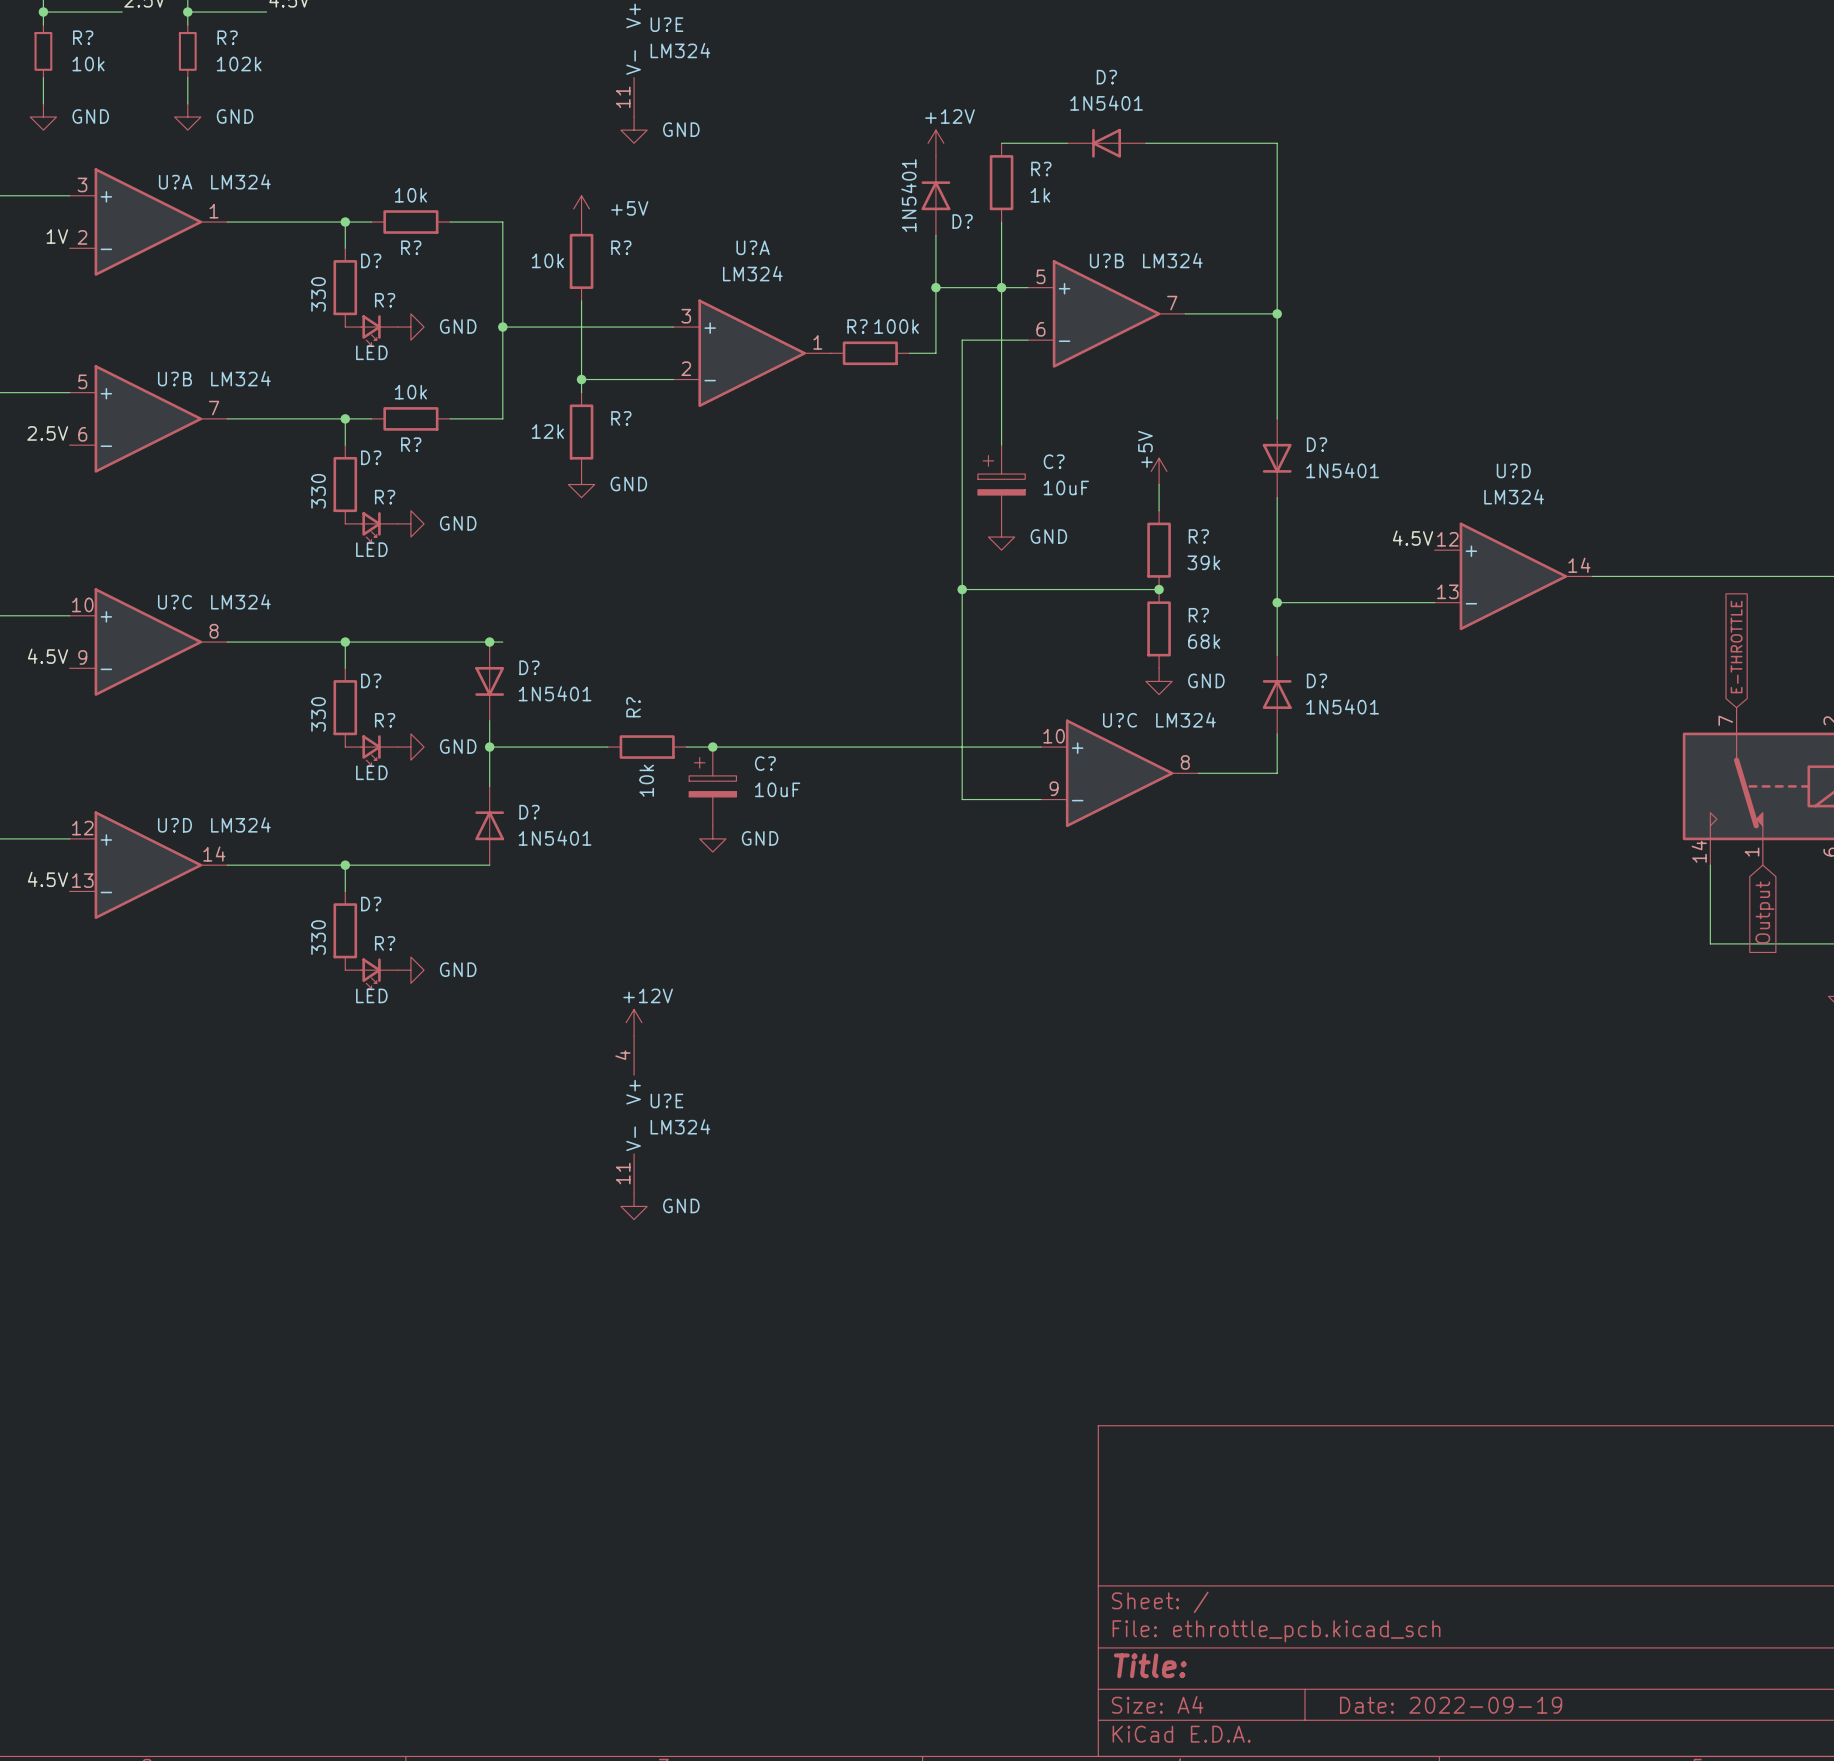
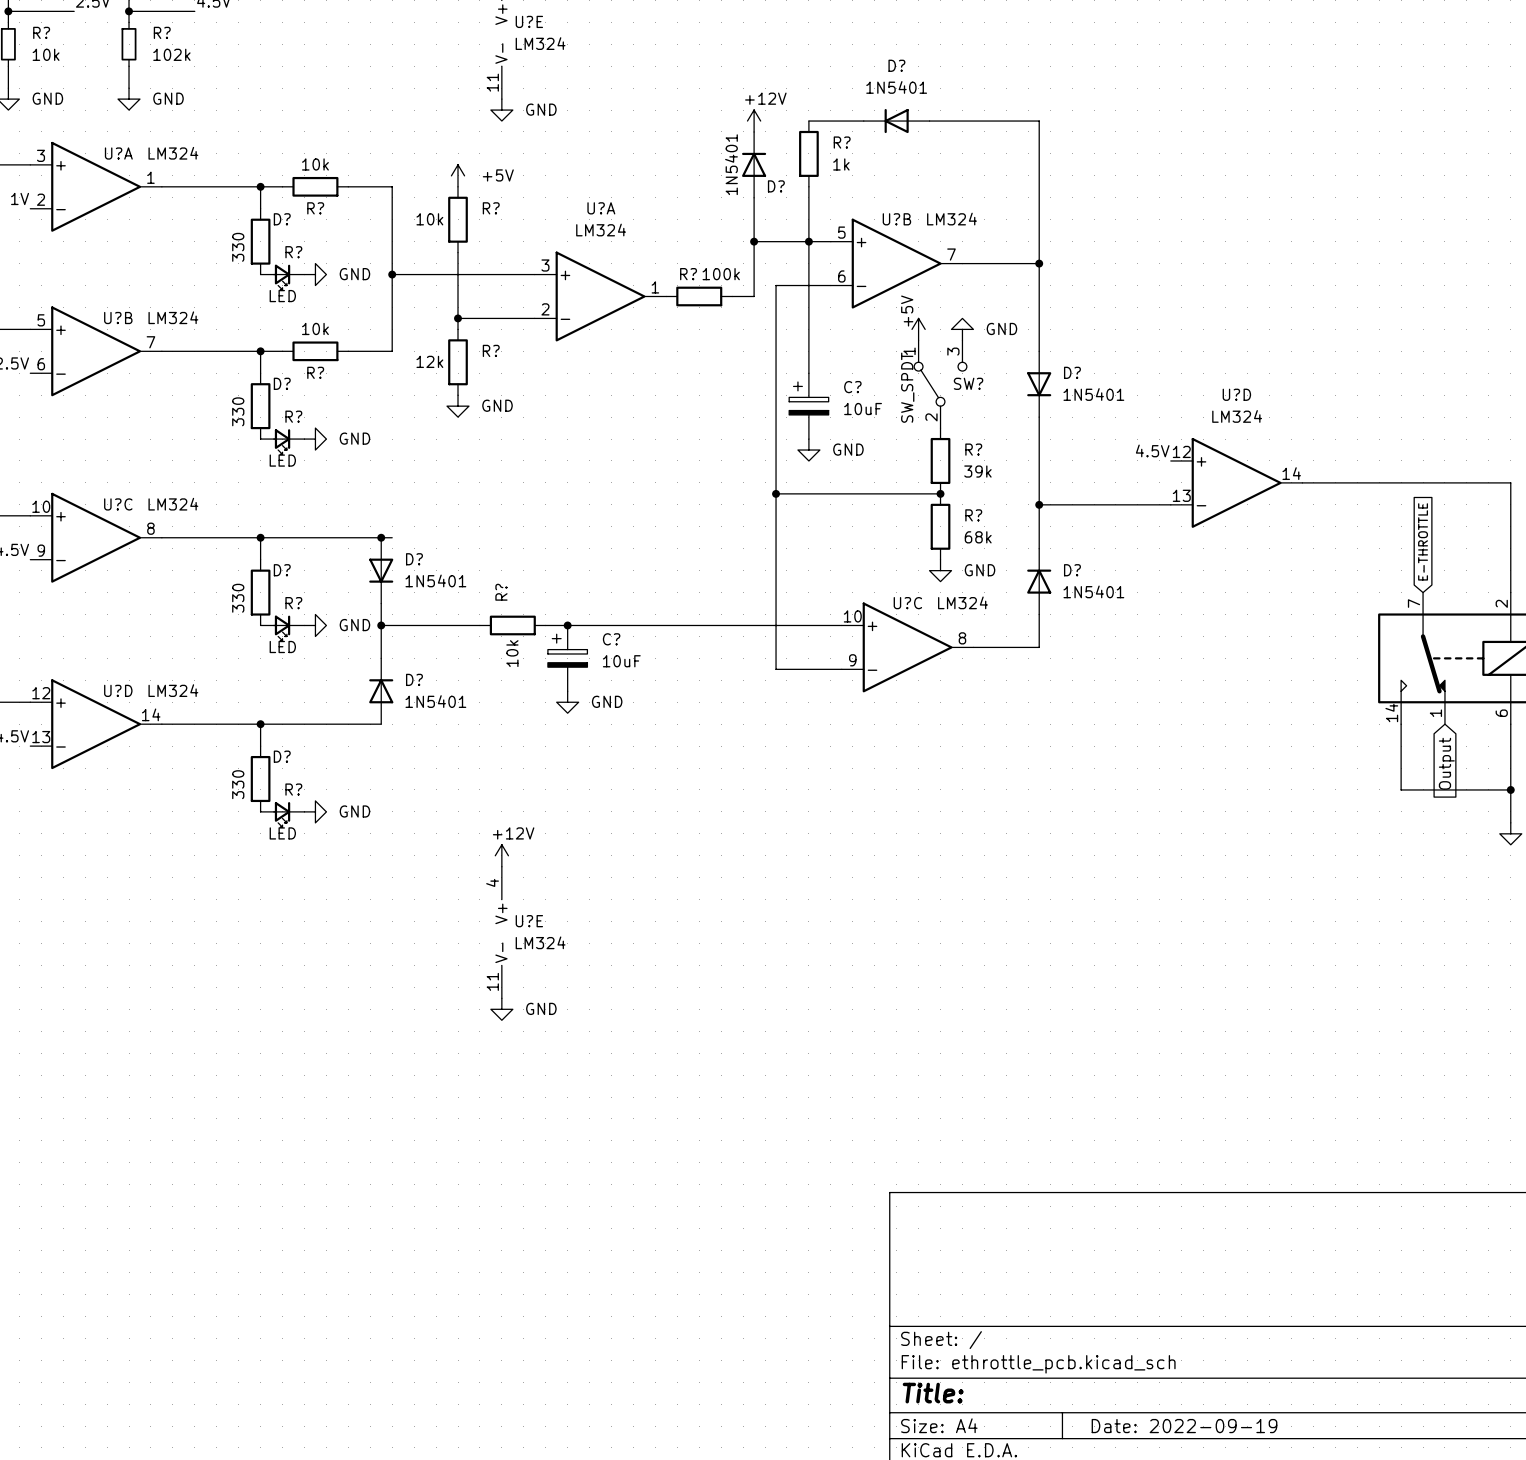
power symbol: none -> GND (962, 329)
SW?: none -> SW_SPDT (940, 384)
power symbol position: +5V (1159, 471) -> +5V (918, 329)

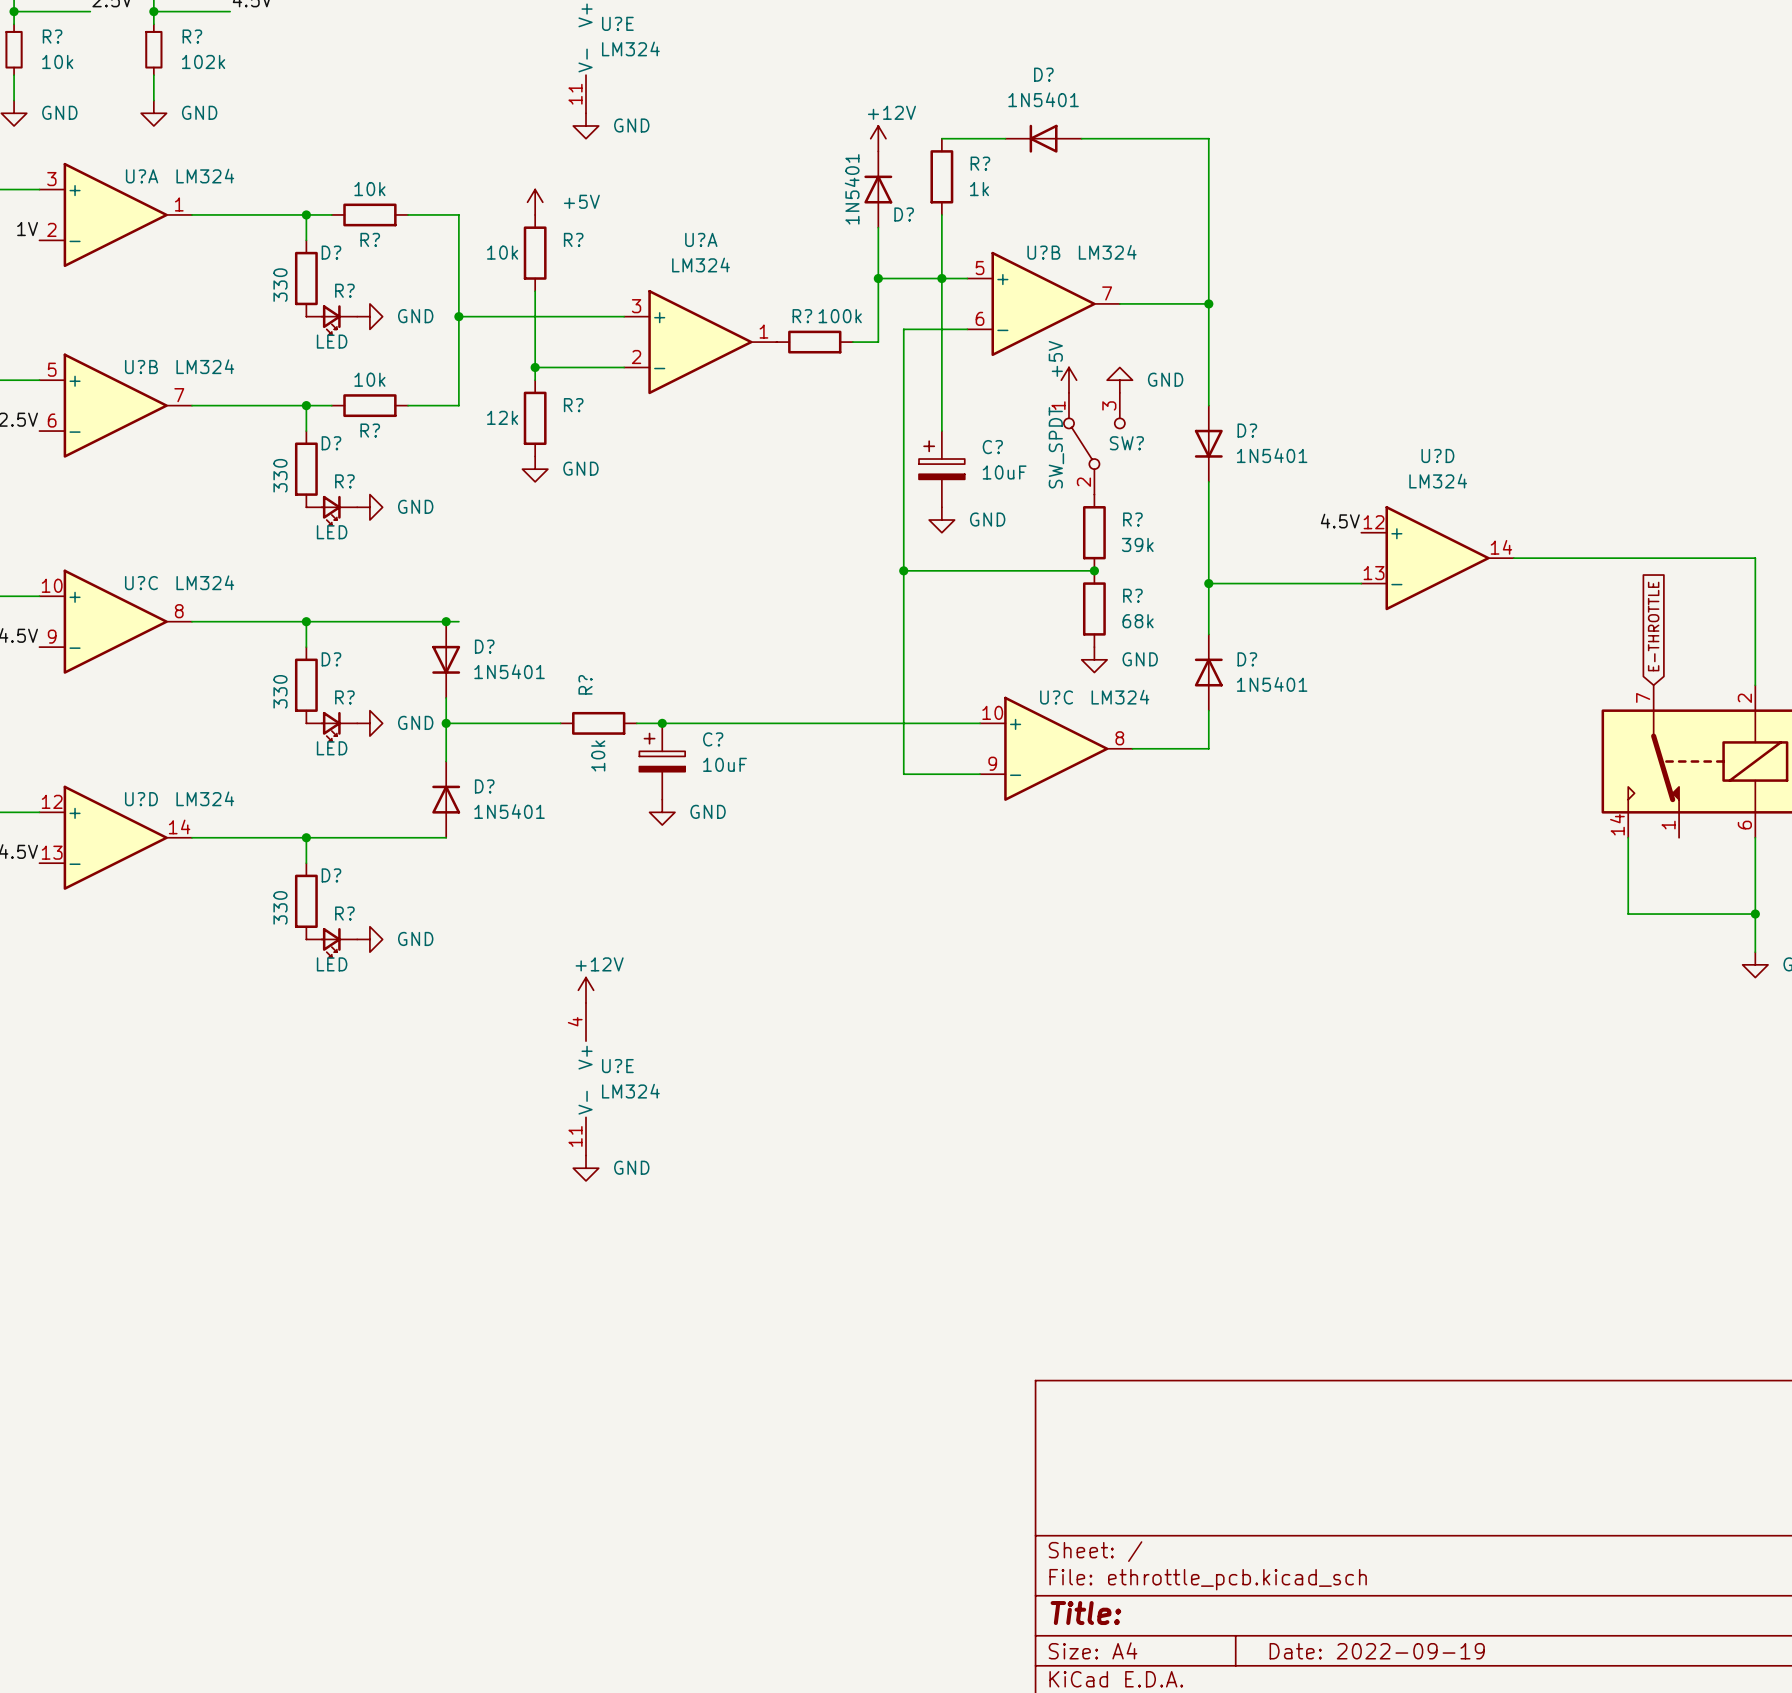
global label: Output (1446, 763) -> none

